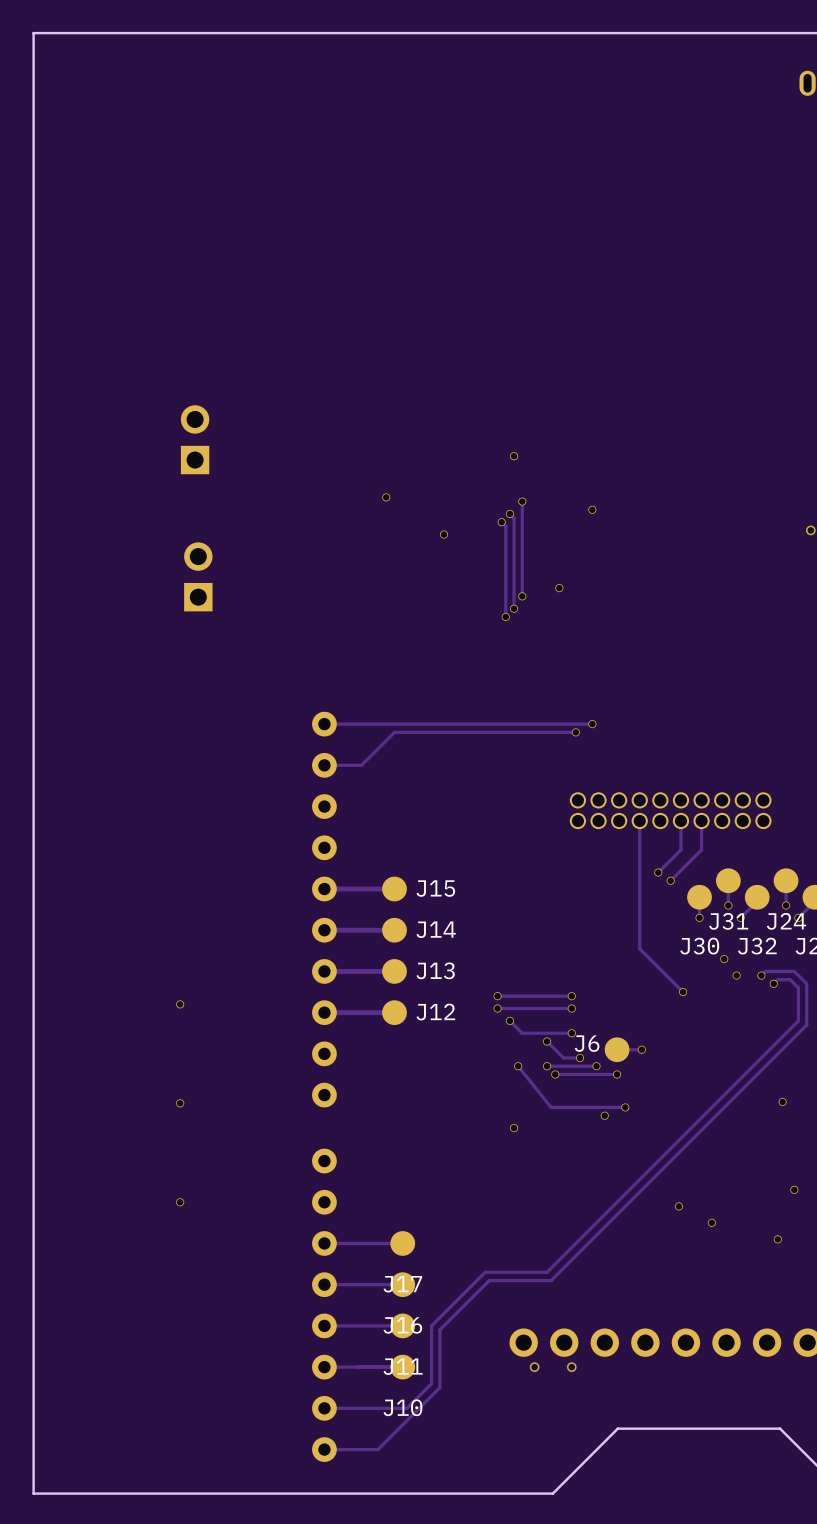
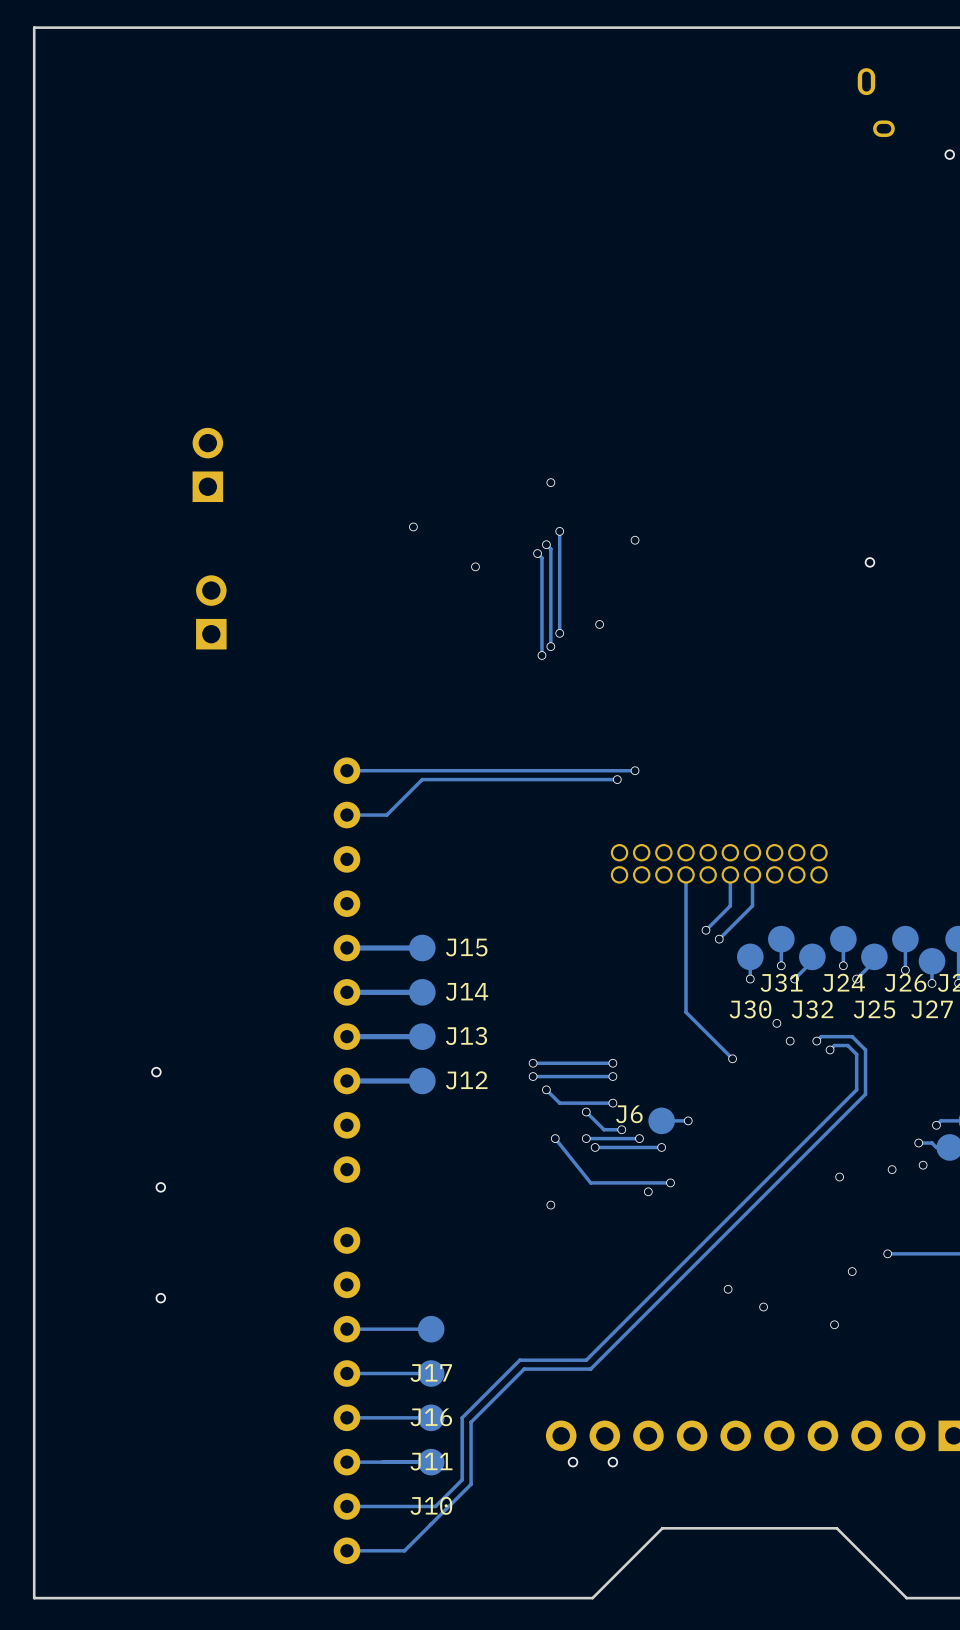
via: none -> (156, 1072)
via: (180, 1004) -> none
via: (180, 1103) -> none
via: none -> (160, 1187)
via: (180, 1202) -> none
via: none -> (160, 1298)

